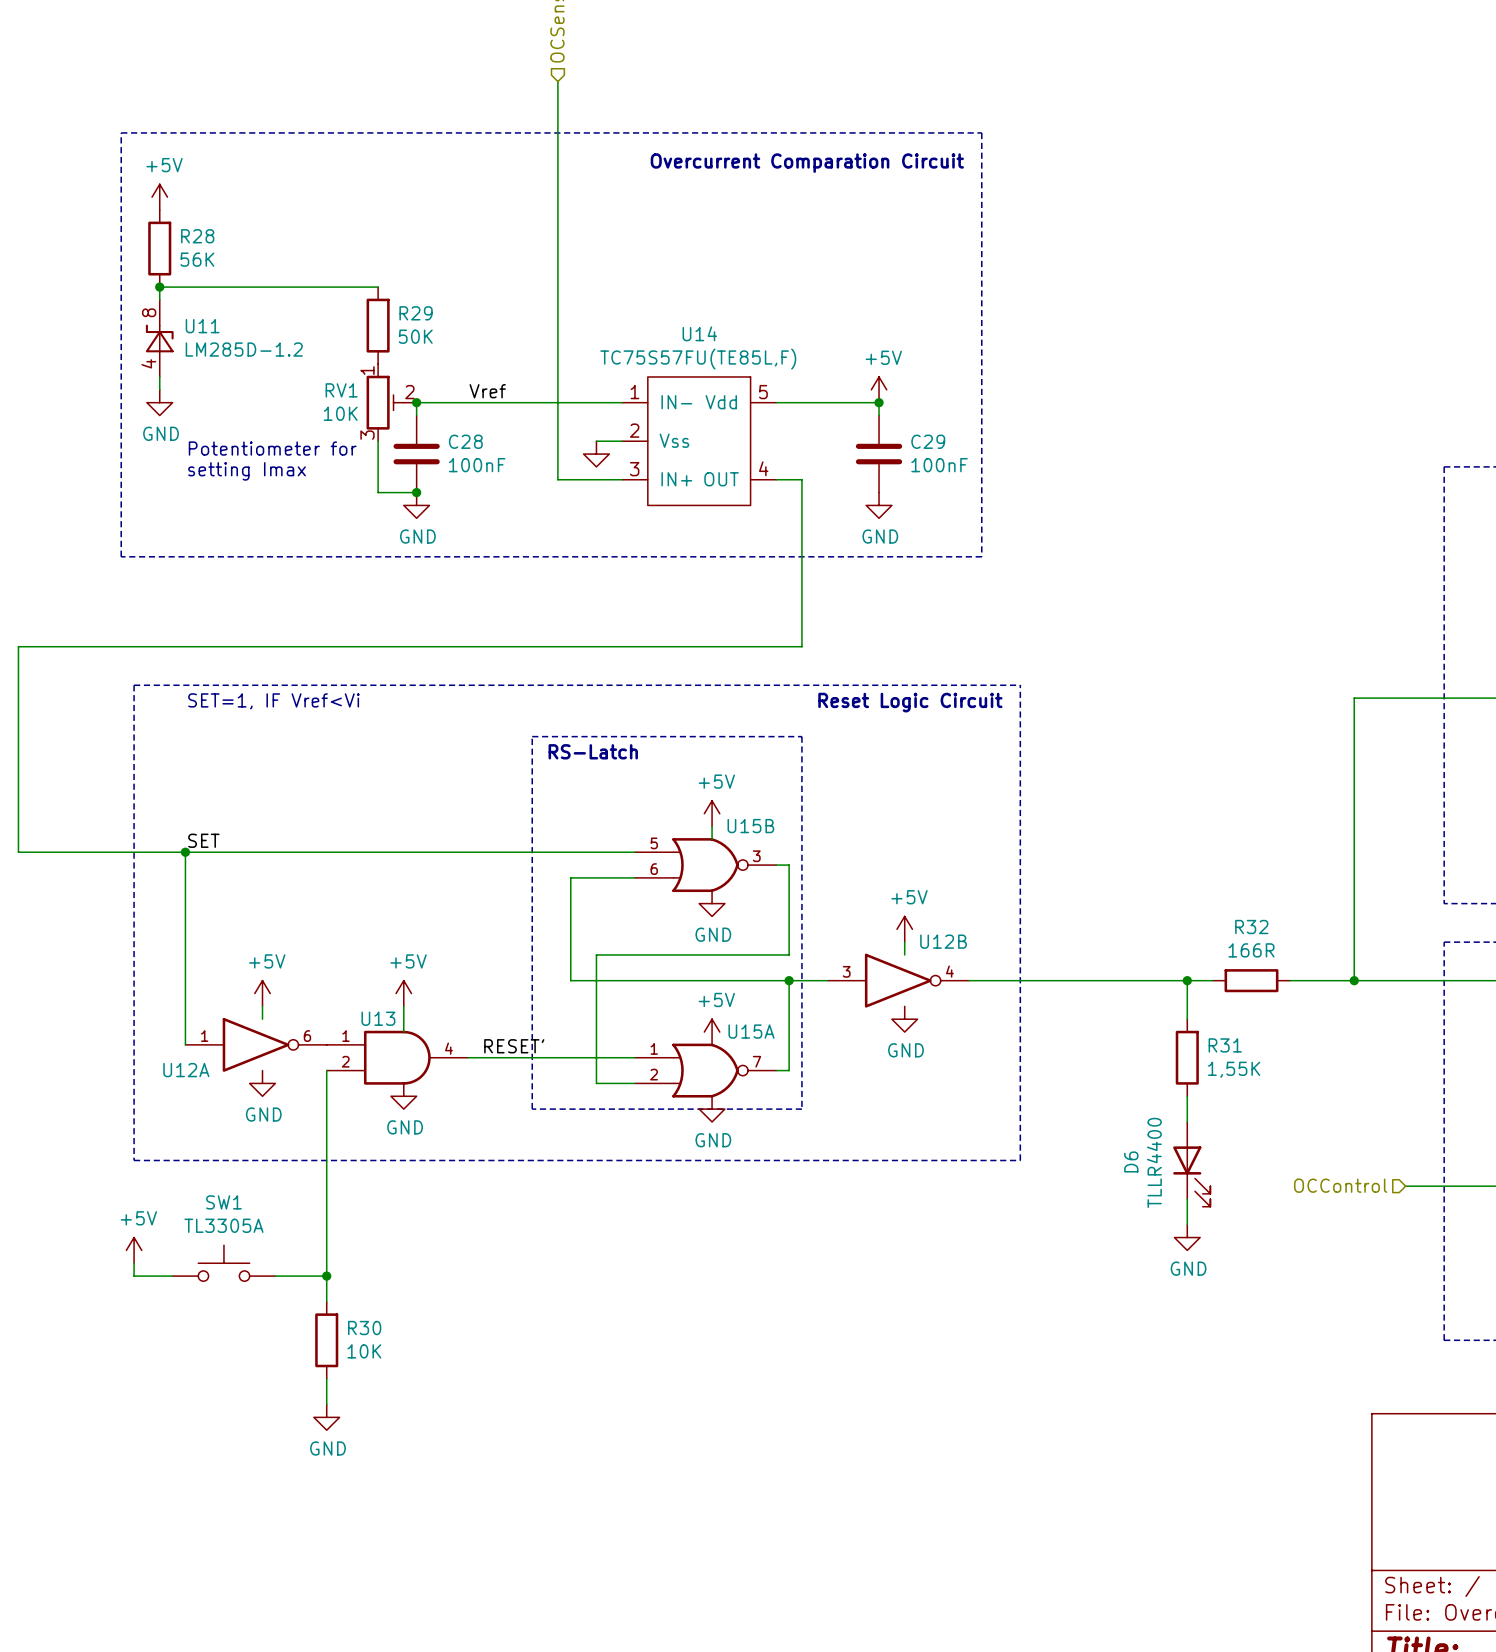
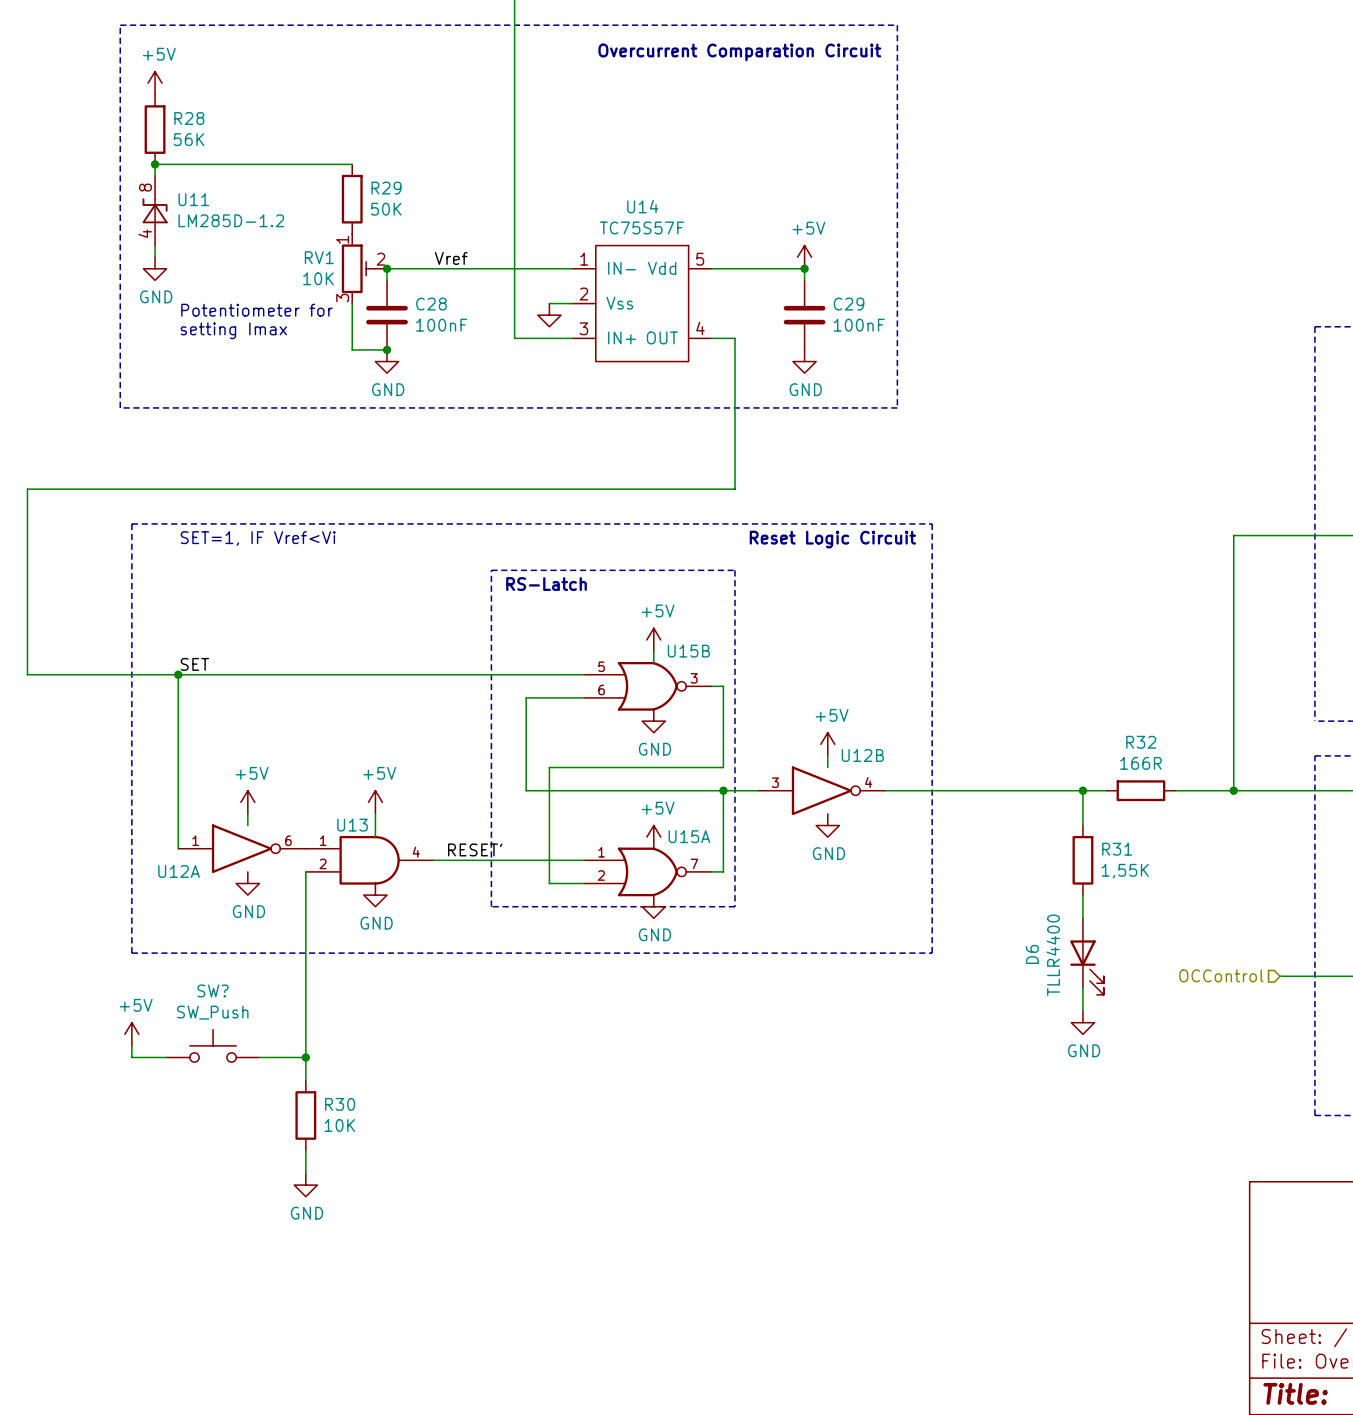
U14 value: TC75S57FU(TE85L,F) (698, 359) -> TC75S57F (641, 227)
SW1 name: SW1 (223, 1202) -> SW? (213, 990)
SW1 value: TL3305A (223, 1225) -> SW_Push (212, 1012)

